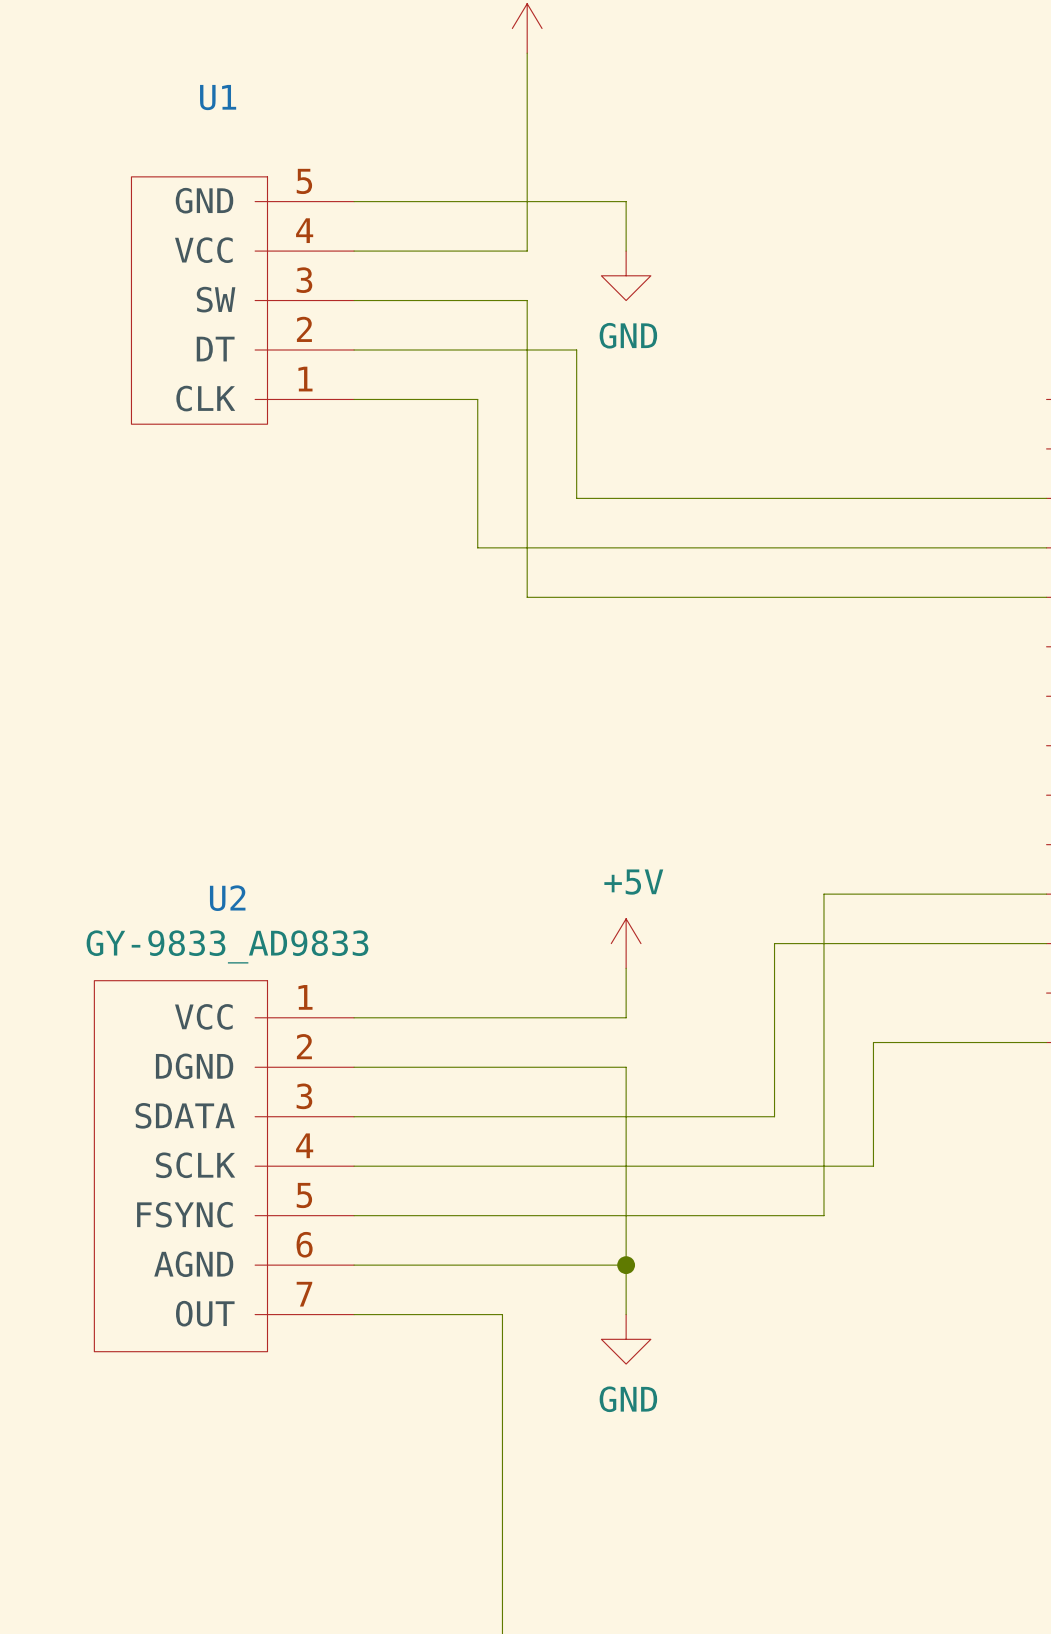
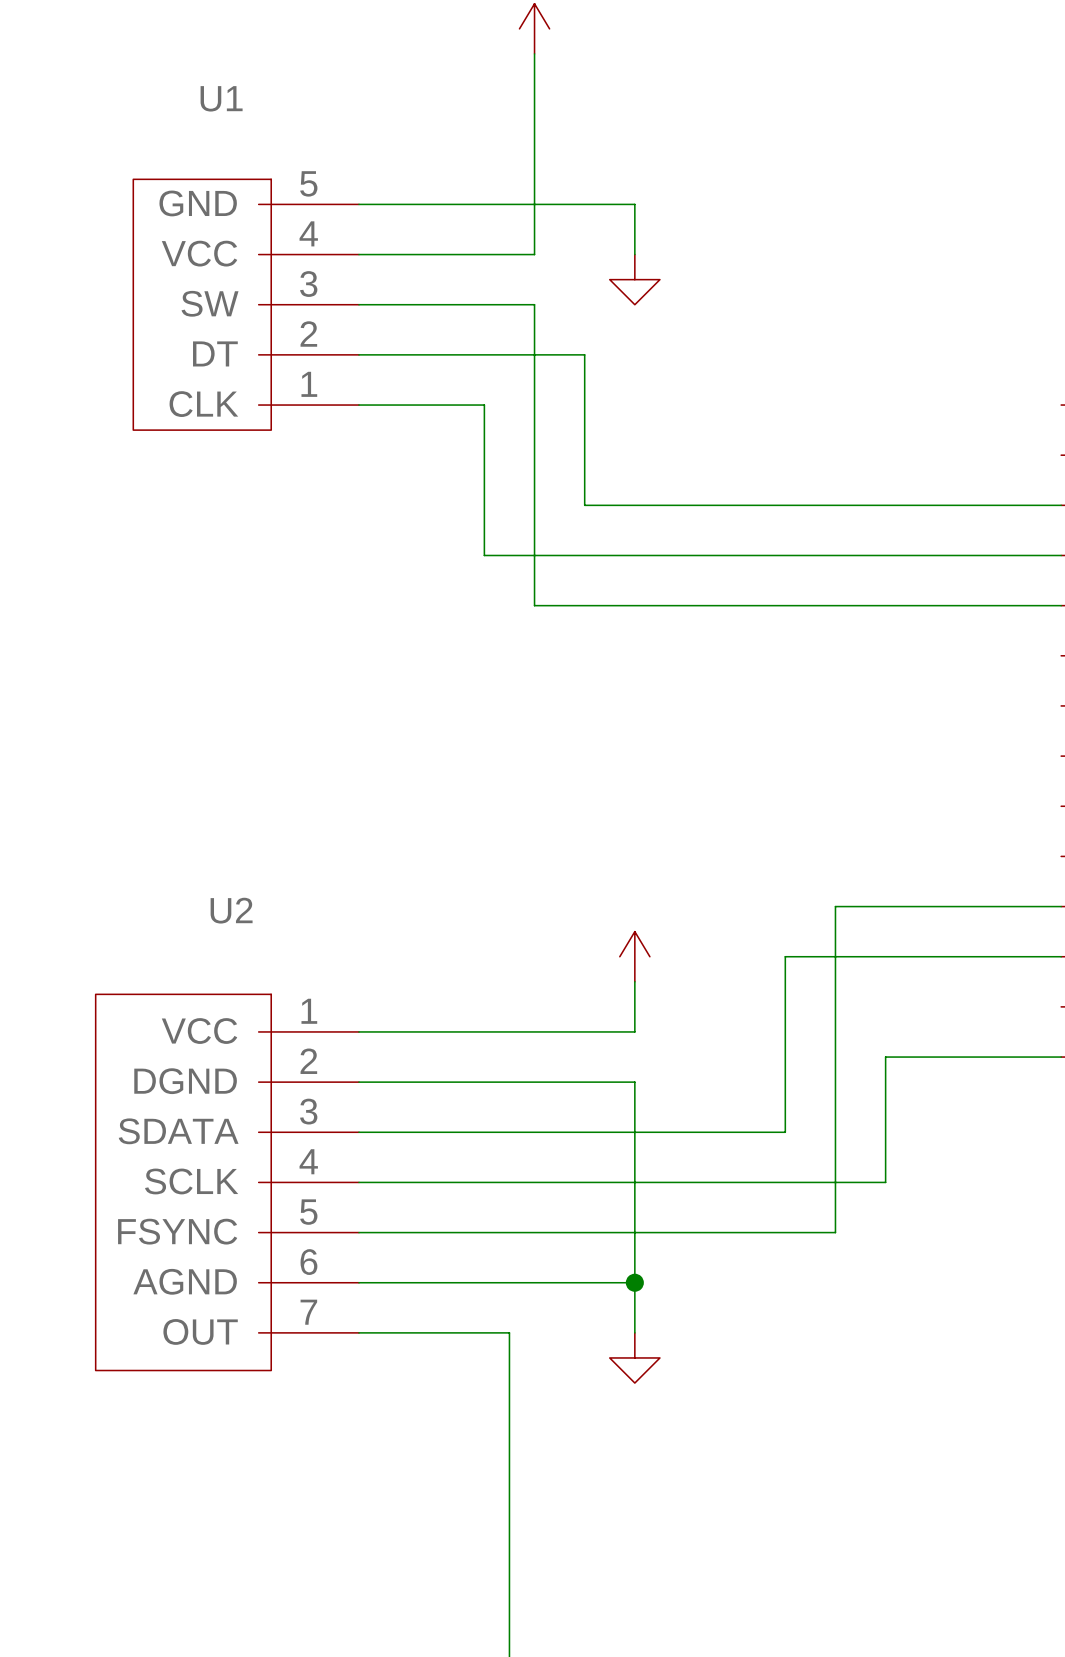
power symbol text: GND (628, 335) -> none
power symbol text: +5V (633, 882) -> none
U2 value: GY-9833_AD9833 (227, 946) -> none
power symbol text: GND (628, 1399) -> none

